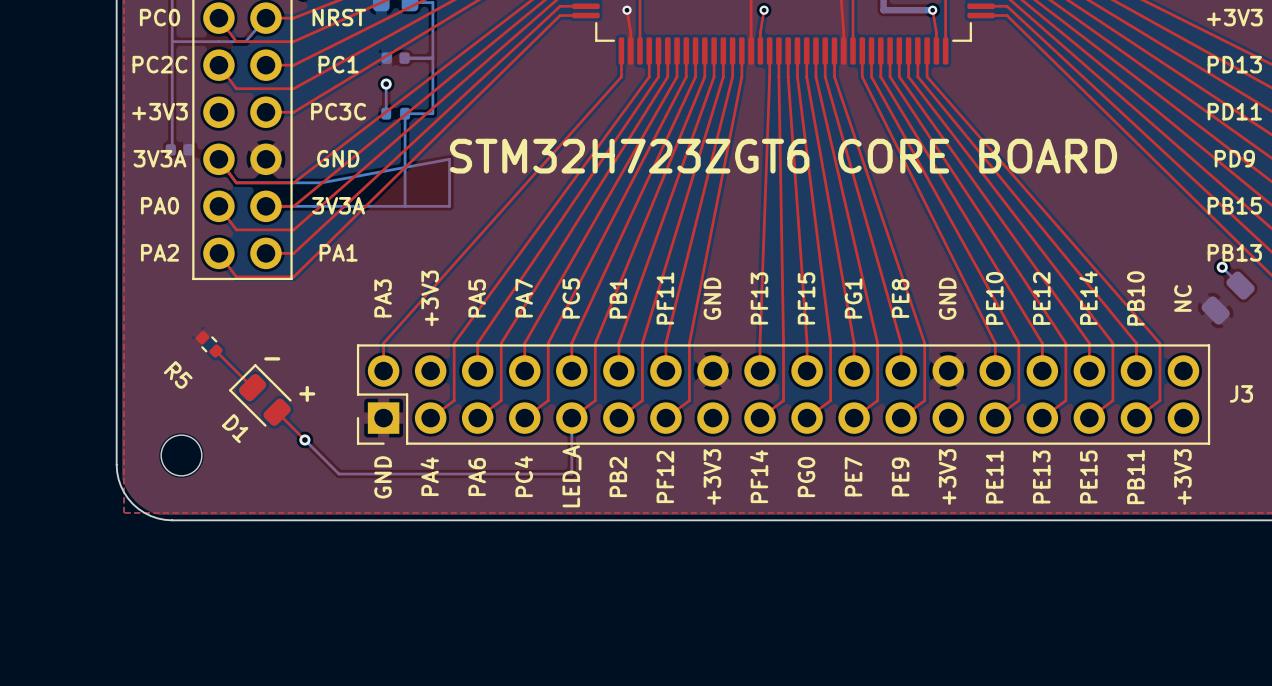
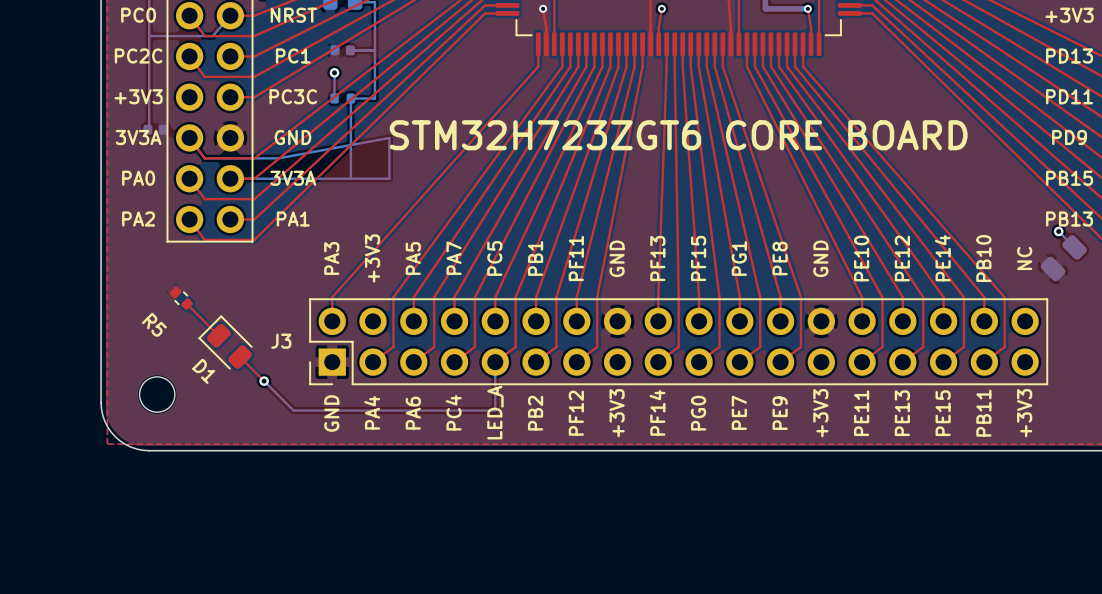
text: - (272, 358) -> none
text: + (307, 393) -> none
J3 name position: J3 (1241, 393) -> J3 (281, 341)

